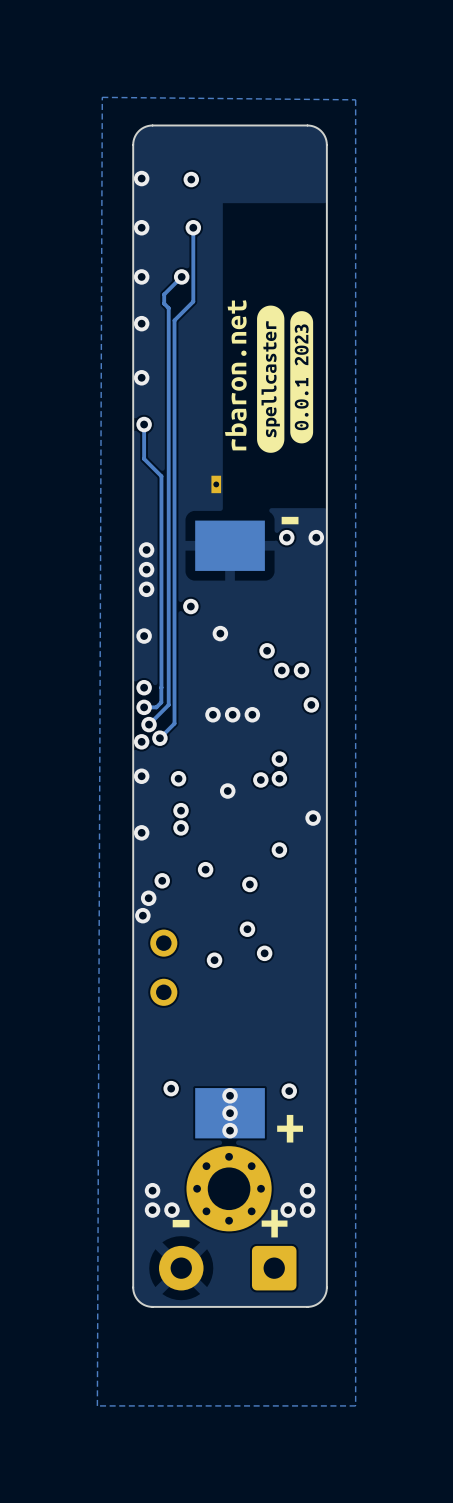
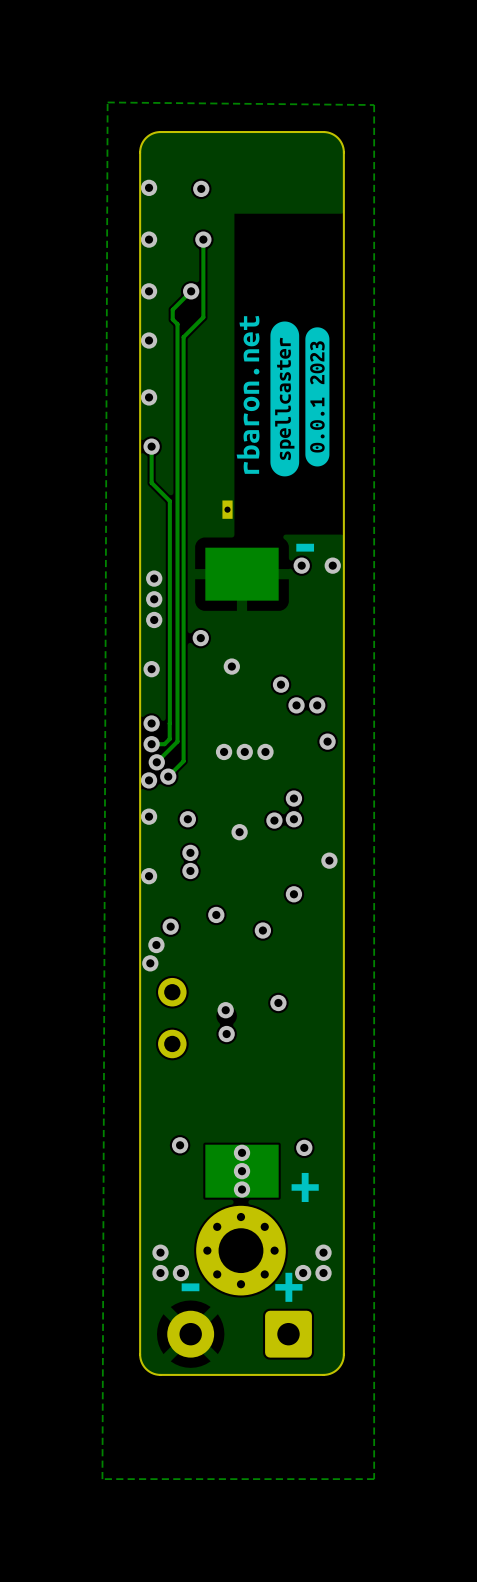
via position: (247, 929) -> (226, 1034)

